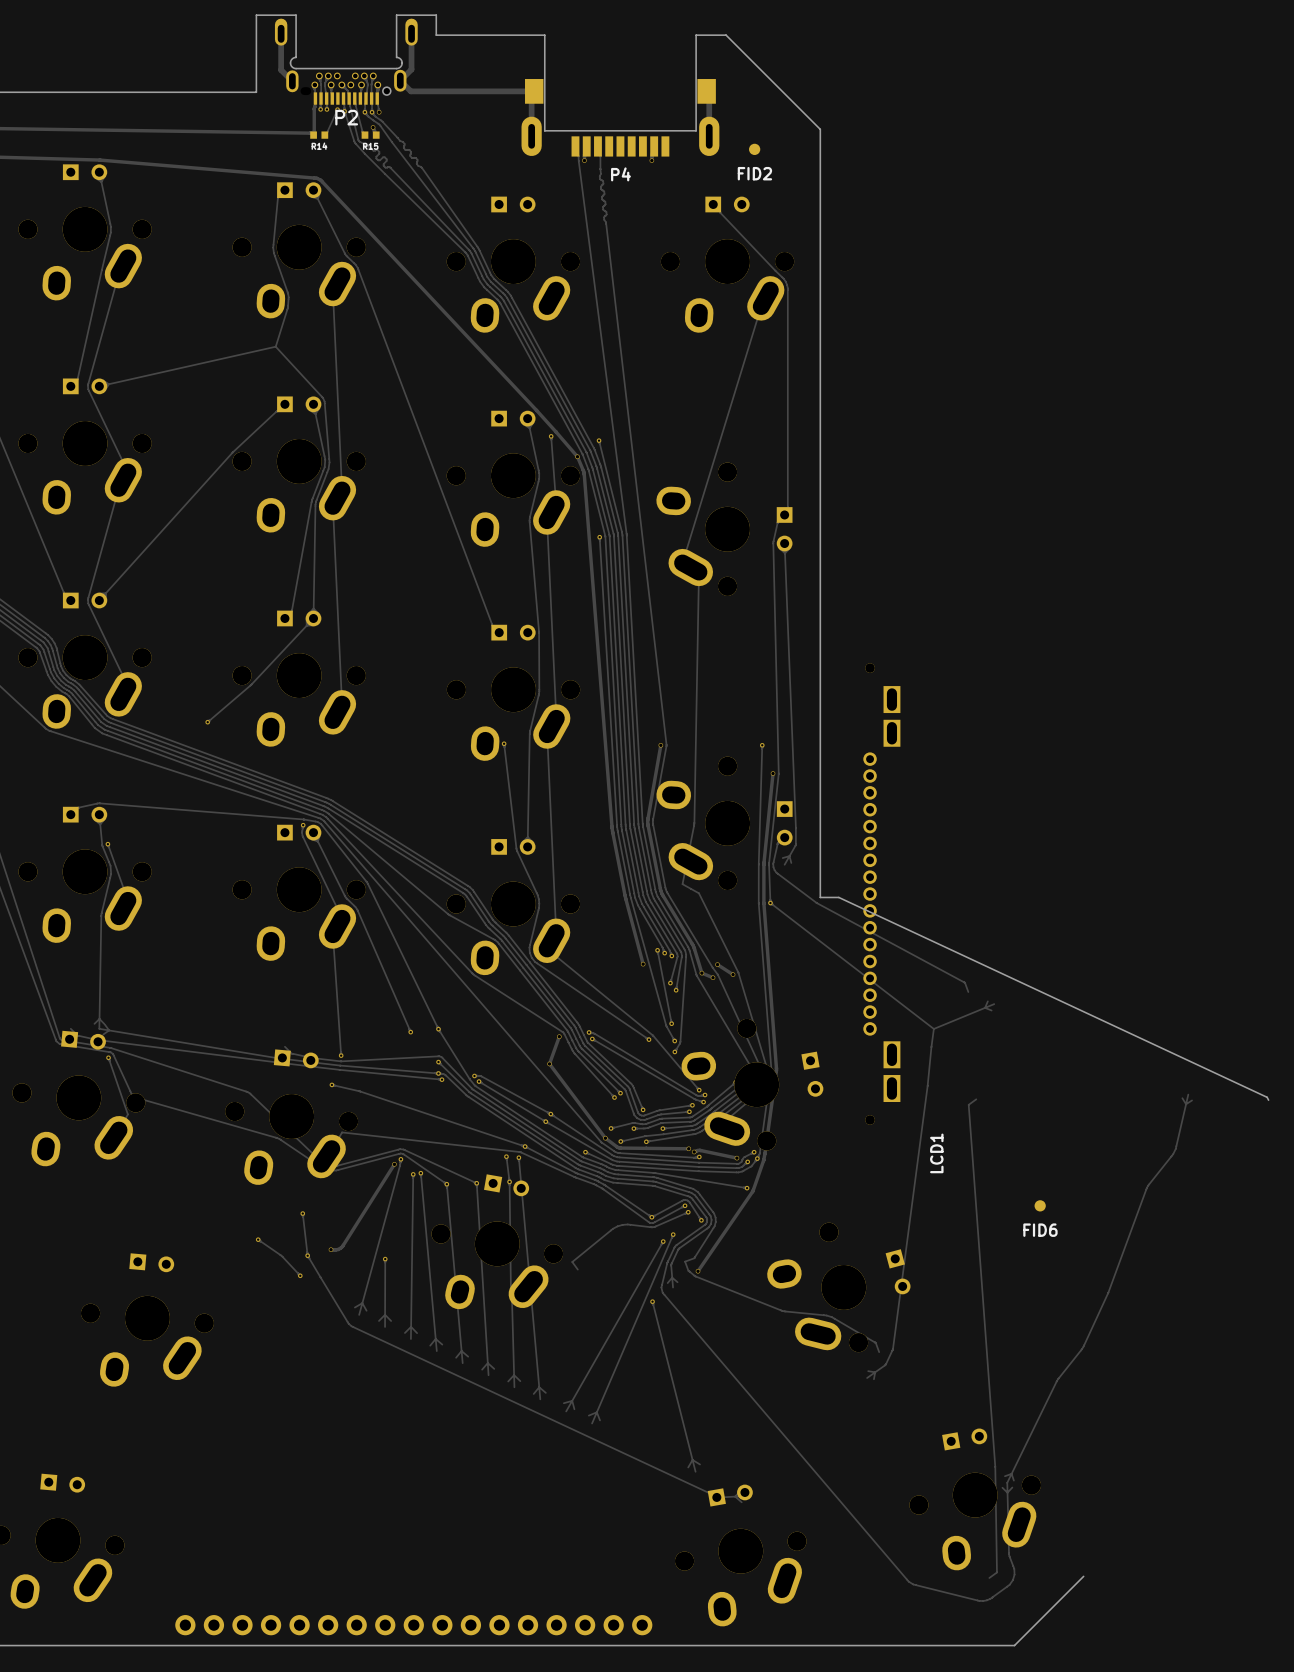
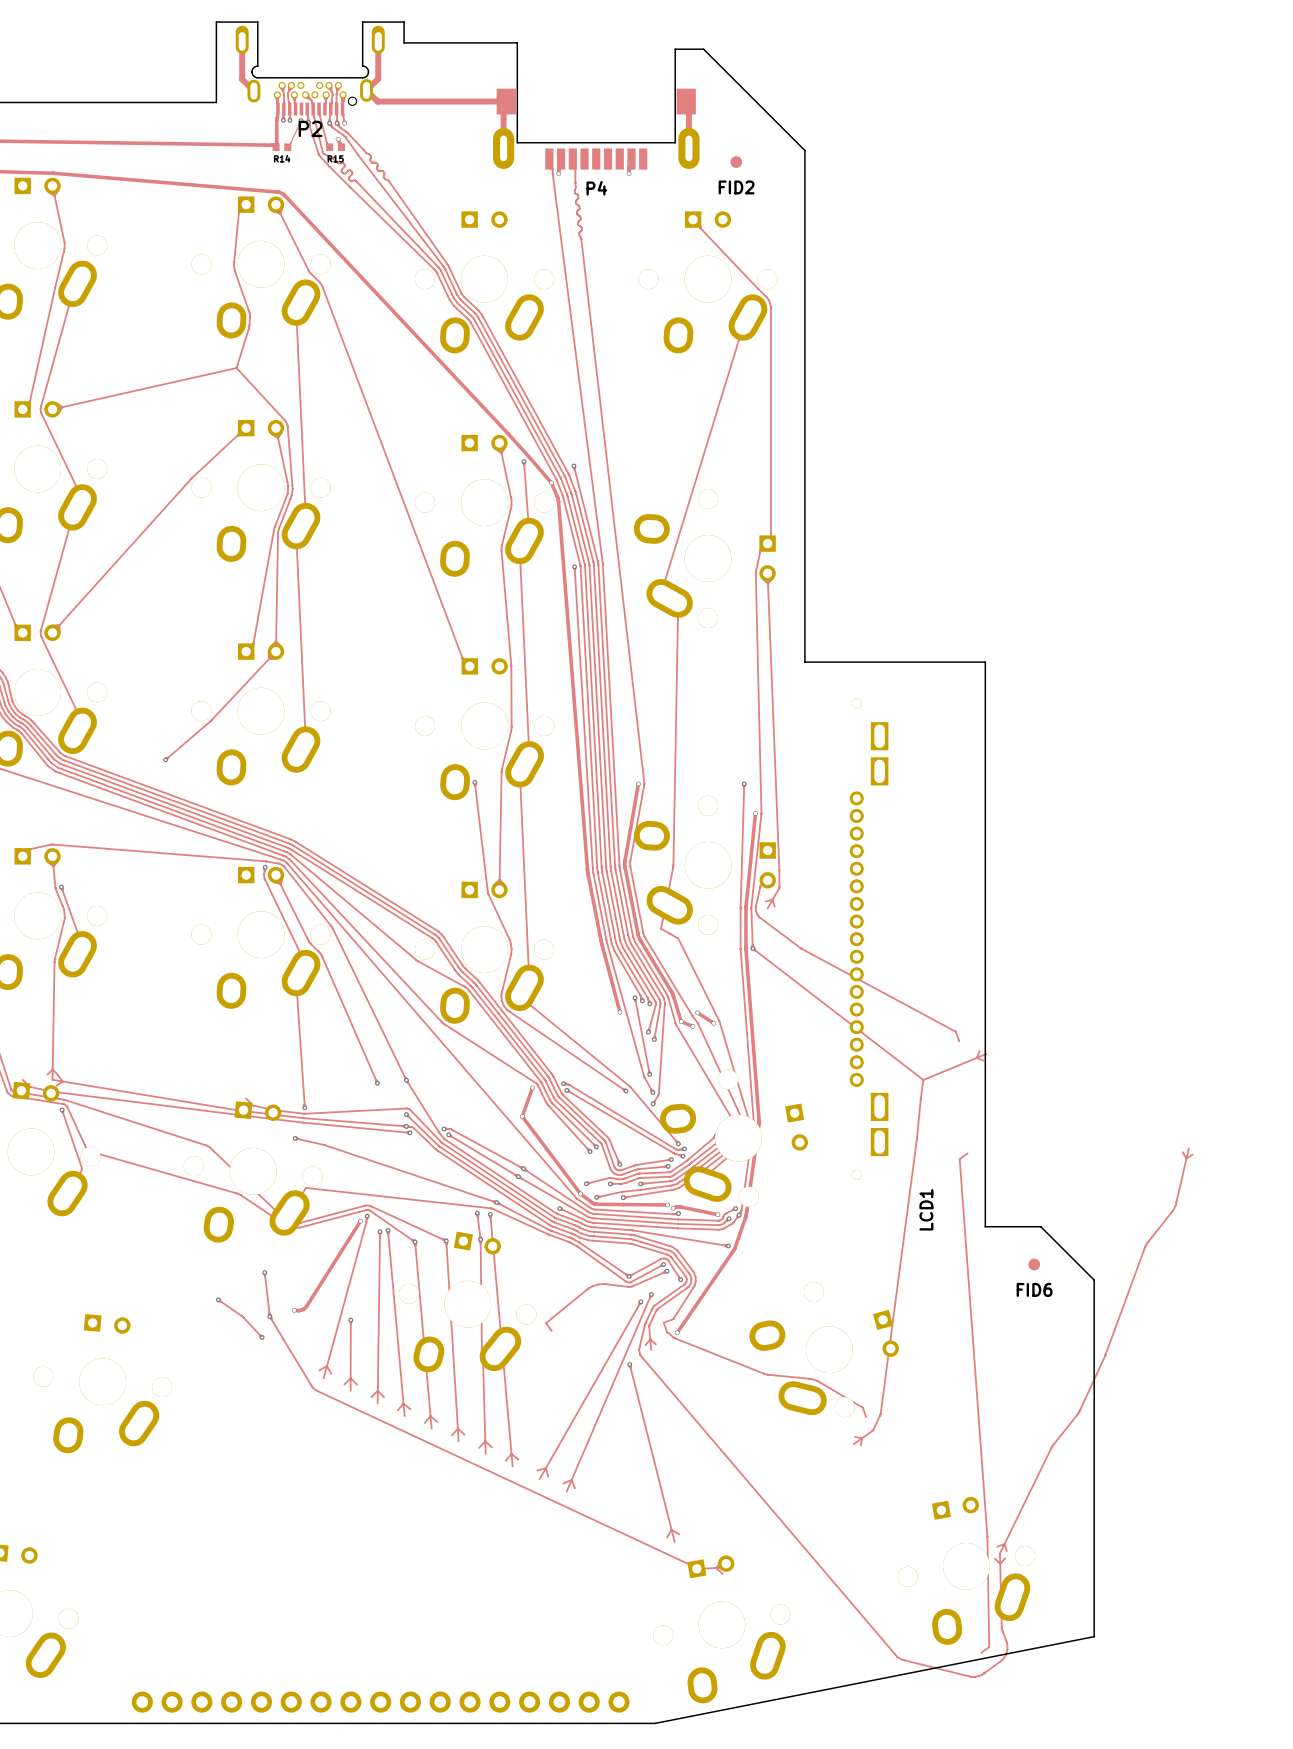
board edge: (696, 41) (696, 35) (726, 35) (820, 129) (820, 897) (838, 897) (1267, 1097) (1268, 1100) -> (675, 49) (703, 49) (804, 150) (804, 662) (985, 662) (985, 1226) (1040, 1226) (1094, 1280) (1094, 1636) (655, 1723)
board edge: (1083, 1576) (1014, 1645) (676, 1645) -> none

